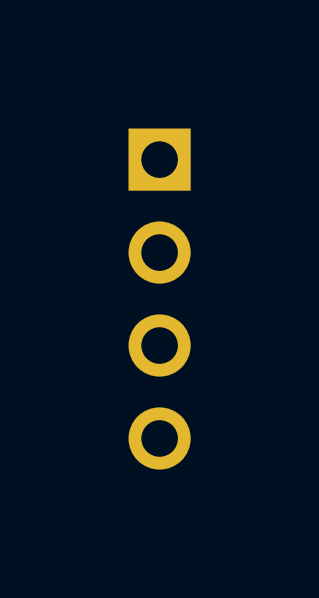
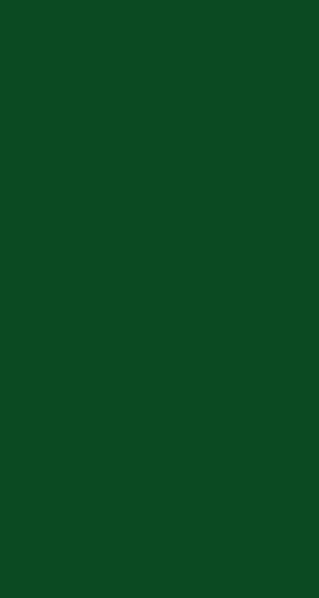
part: (159, 299) -> none

